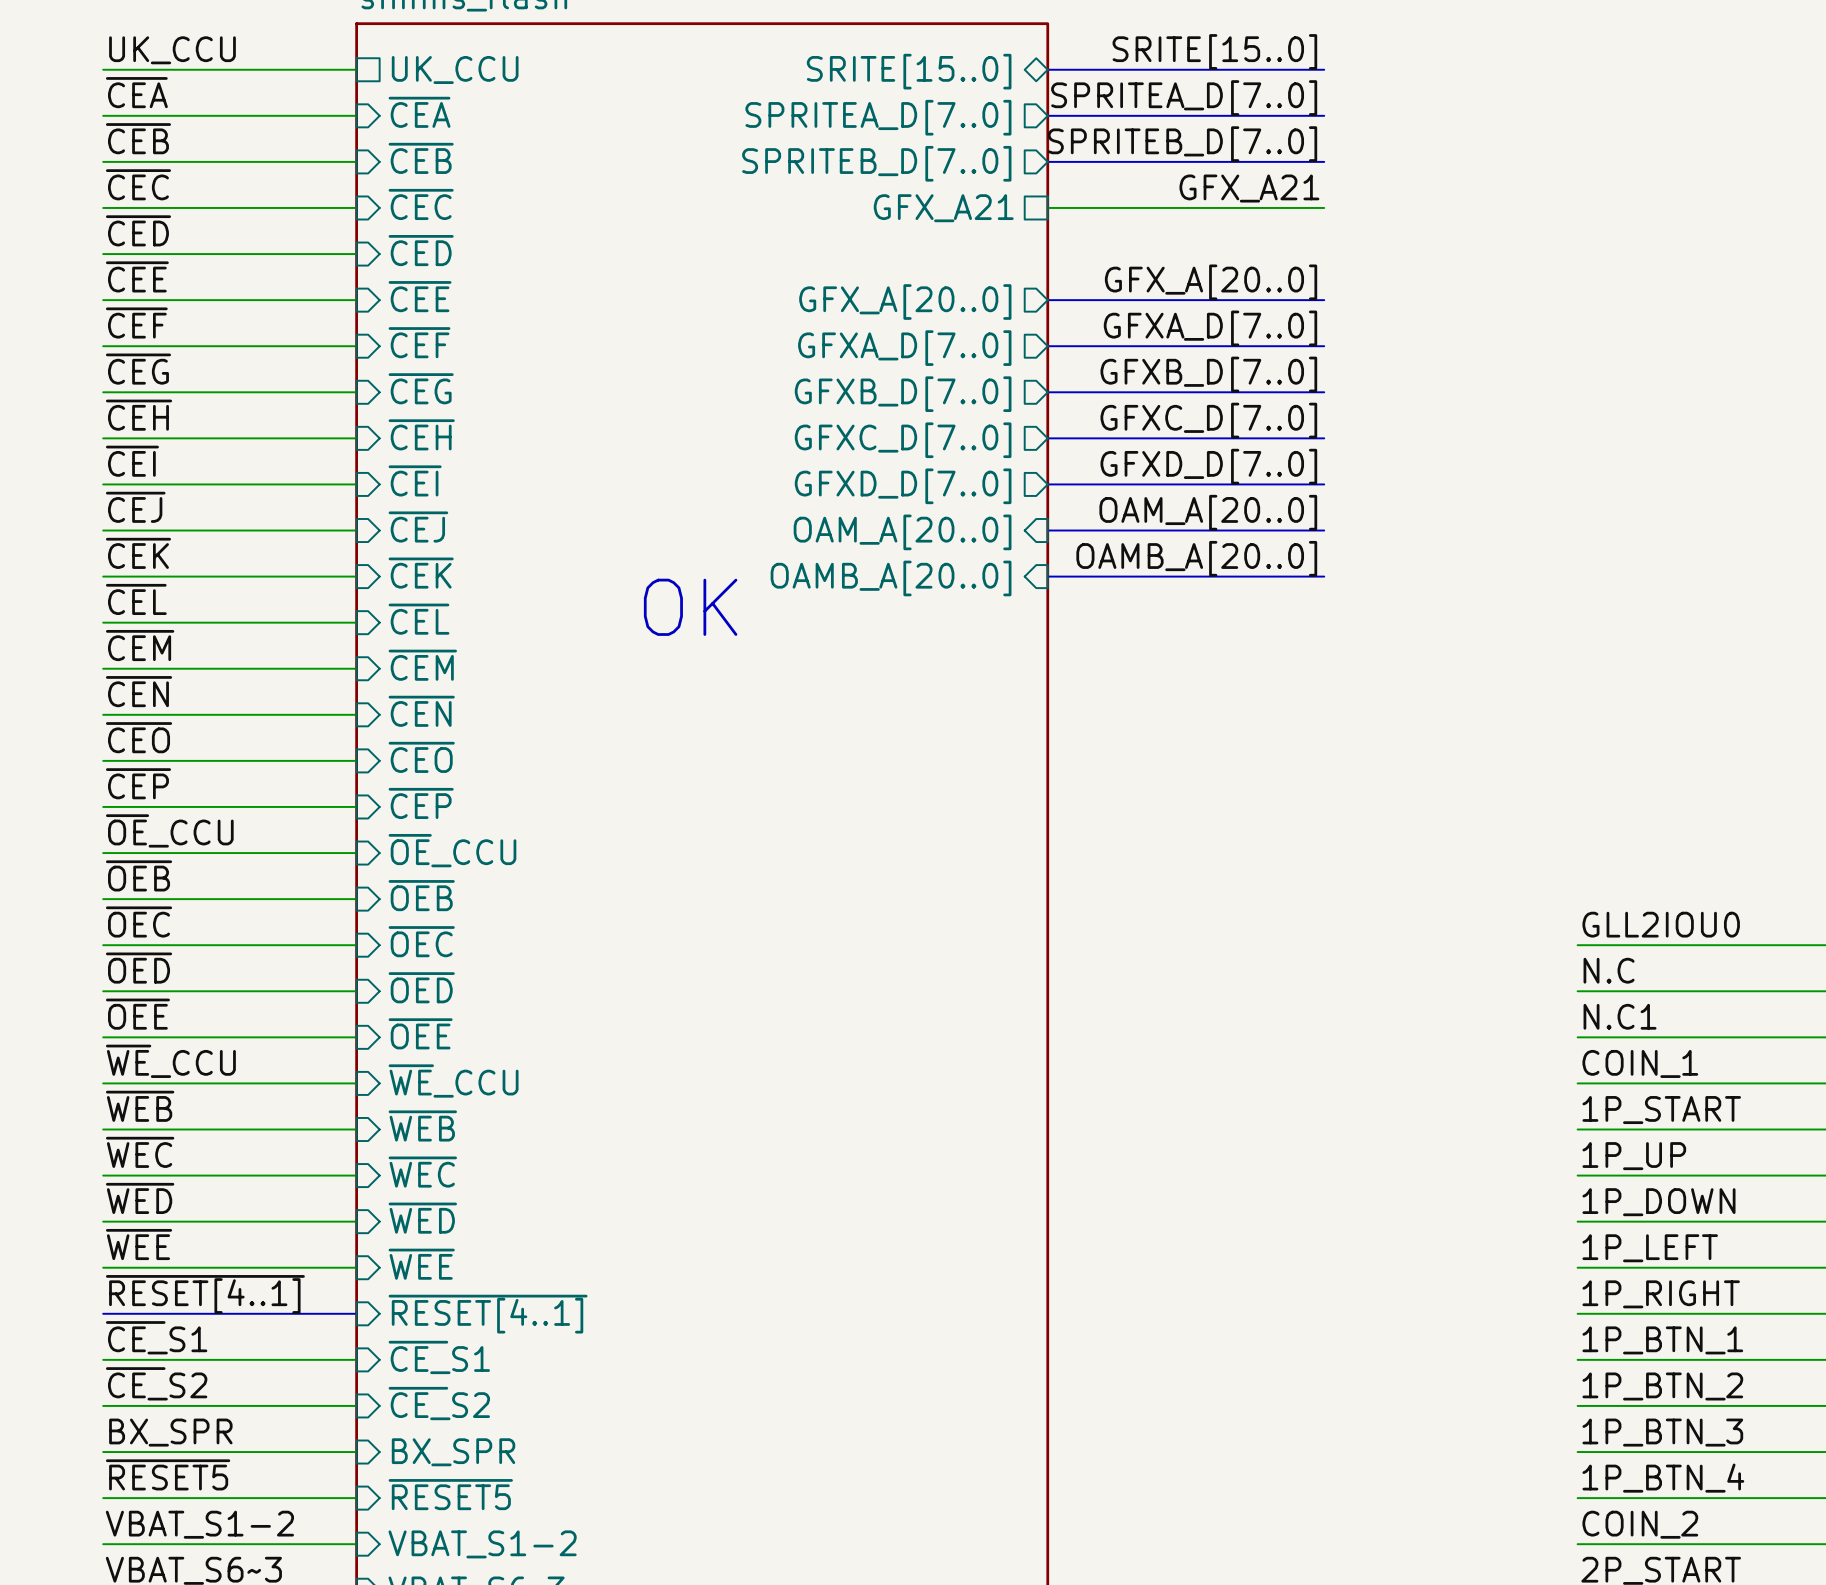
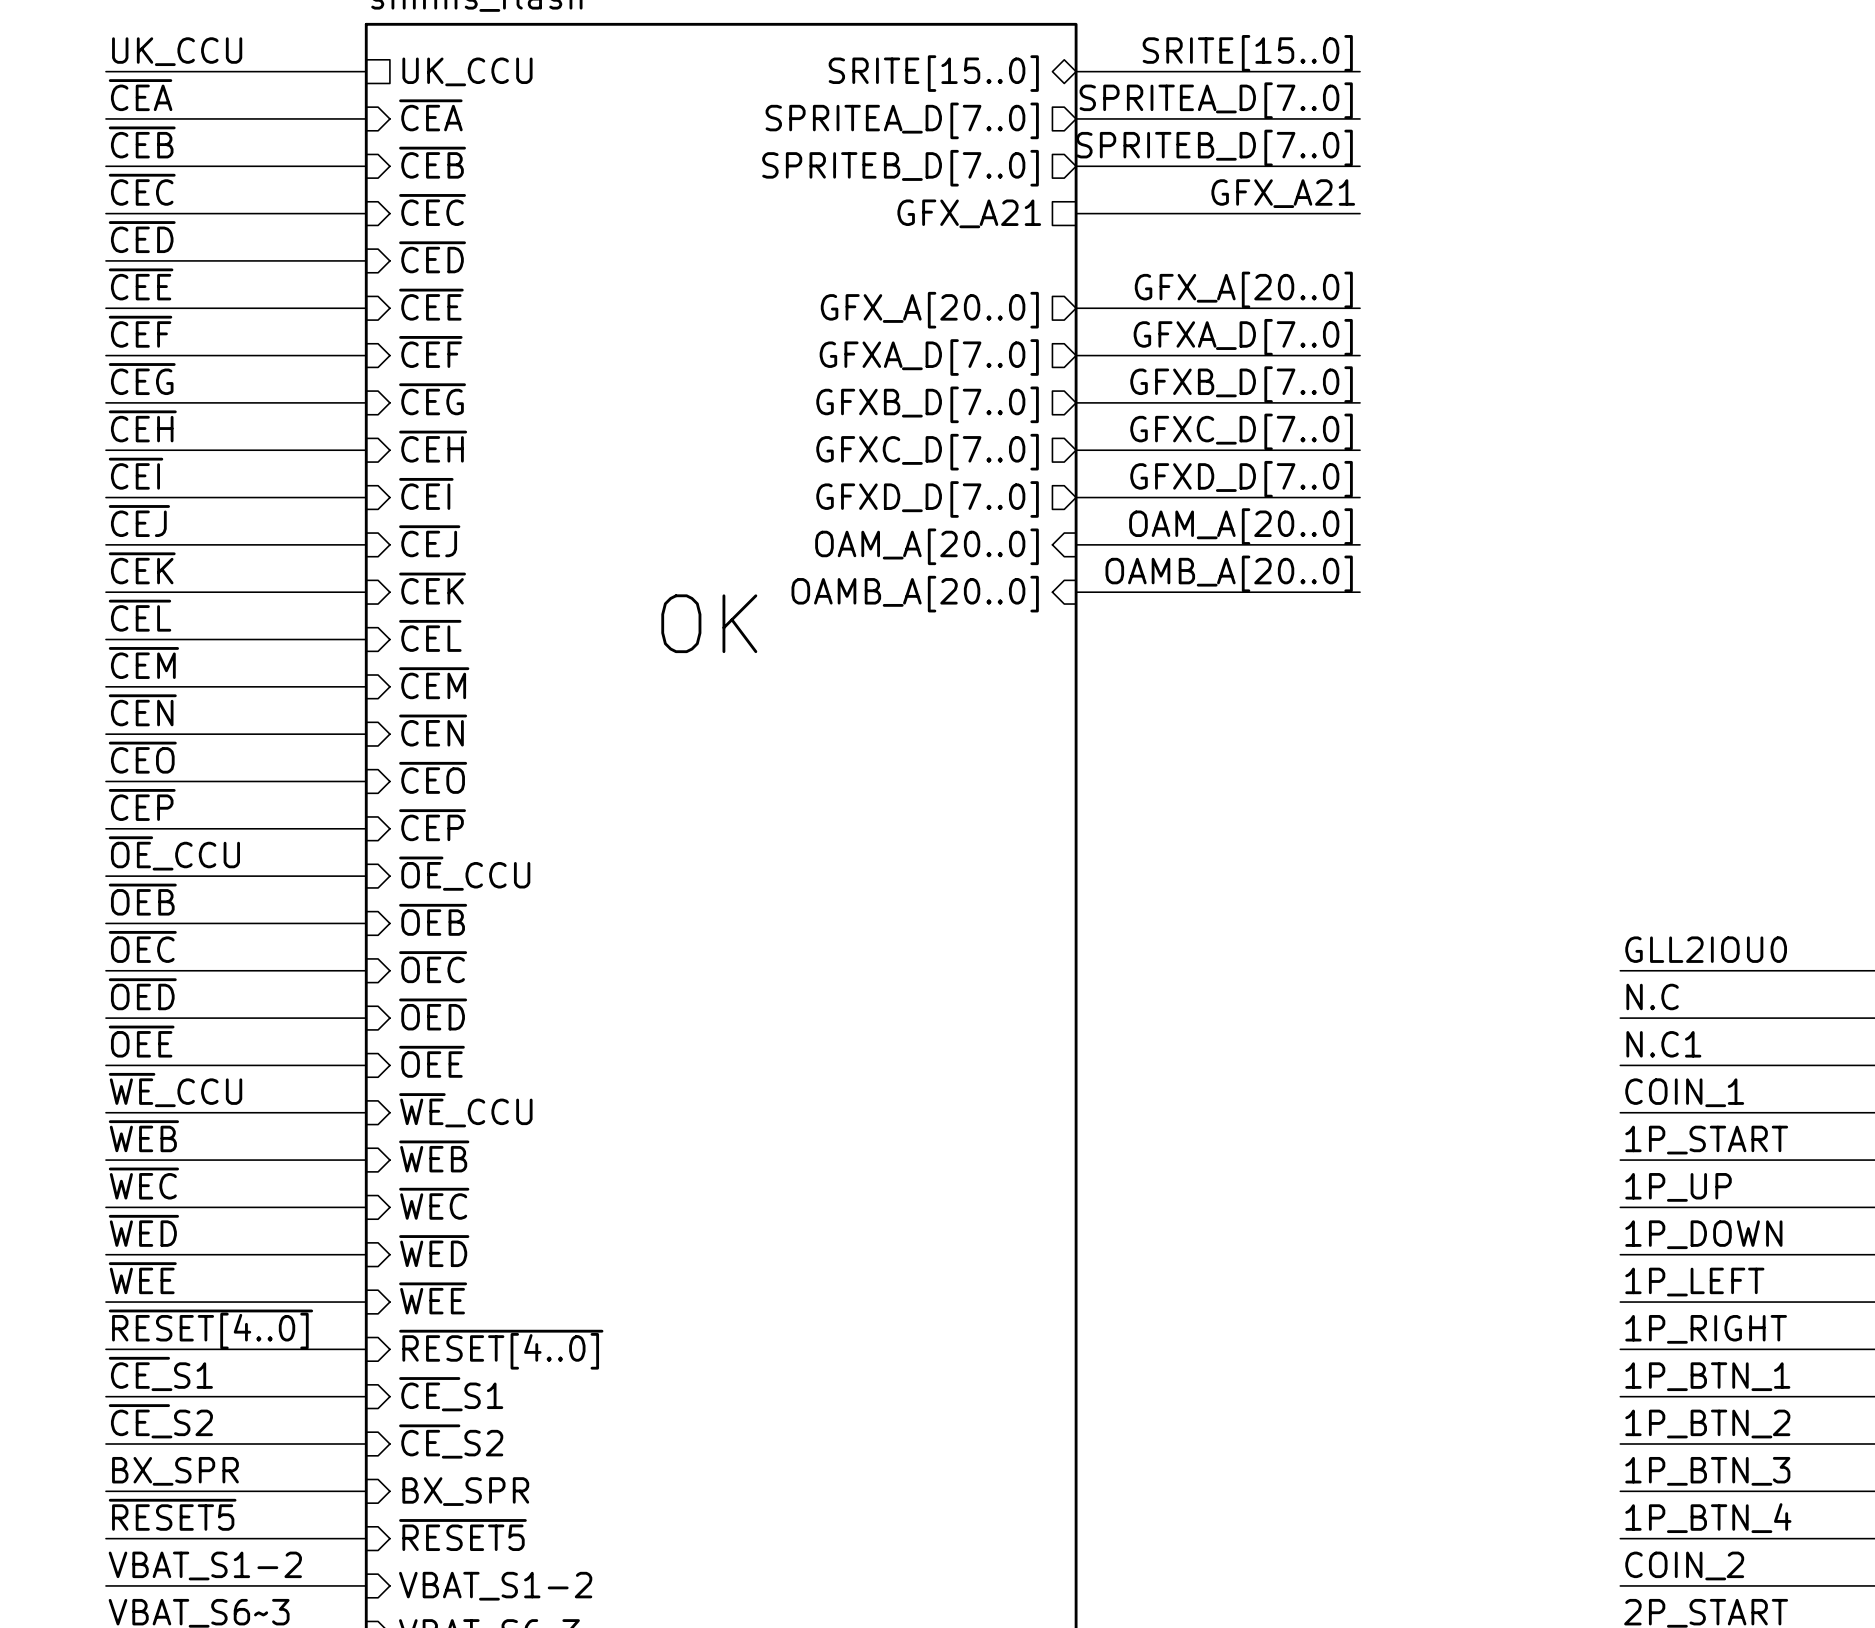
label: ~{RESET[4..1]} (205, 1294) -> ~{RESET[4..0]} (210, 1329)
sheet pin: ~{RESET[4..1]} (488, 1314) -> ~{RESET[4..0]} (501, 1349)

